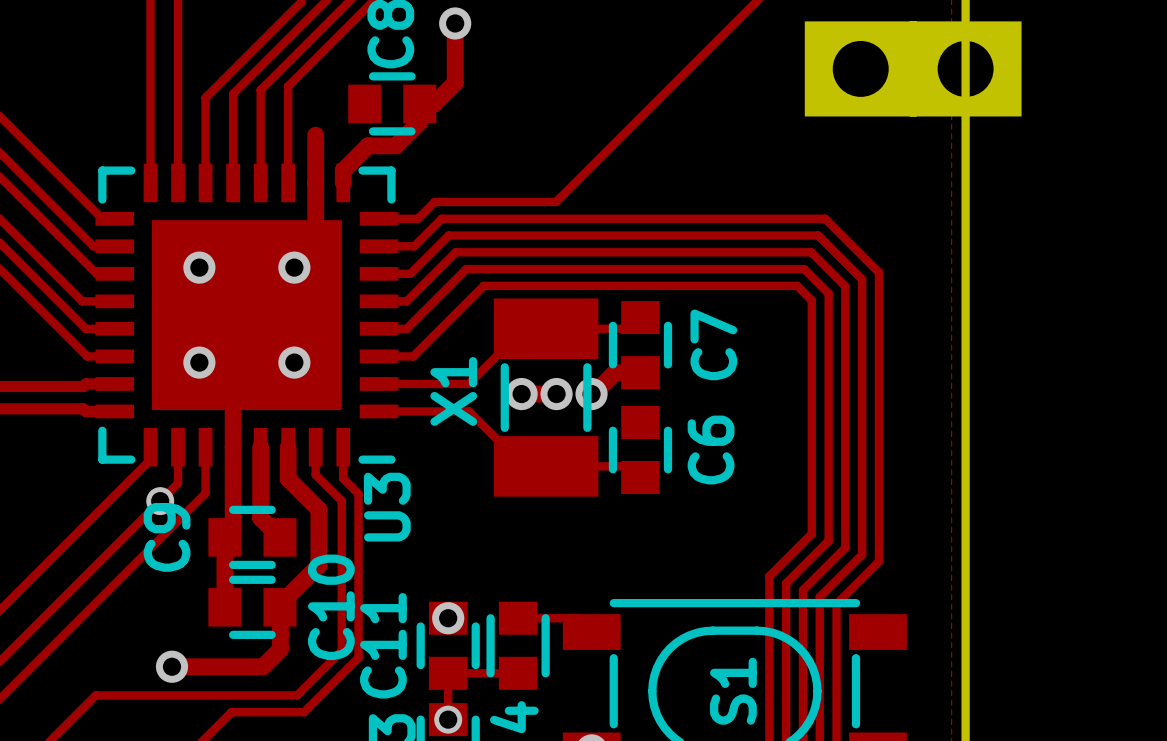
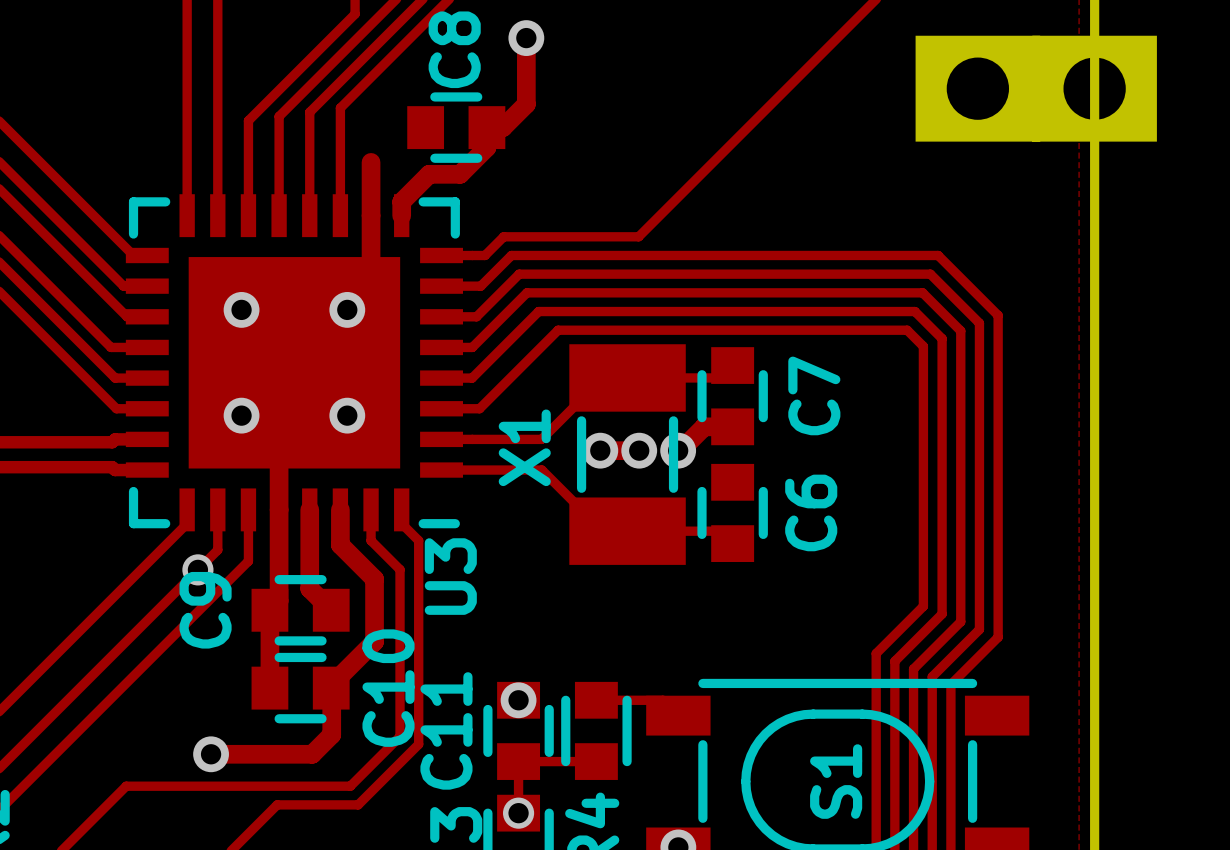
track: (343, 459) (343, 478) (358, 493) -> (401, 523) (418, 540) (418, 561)

